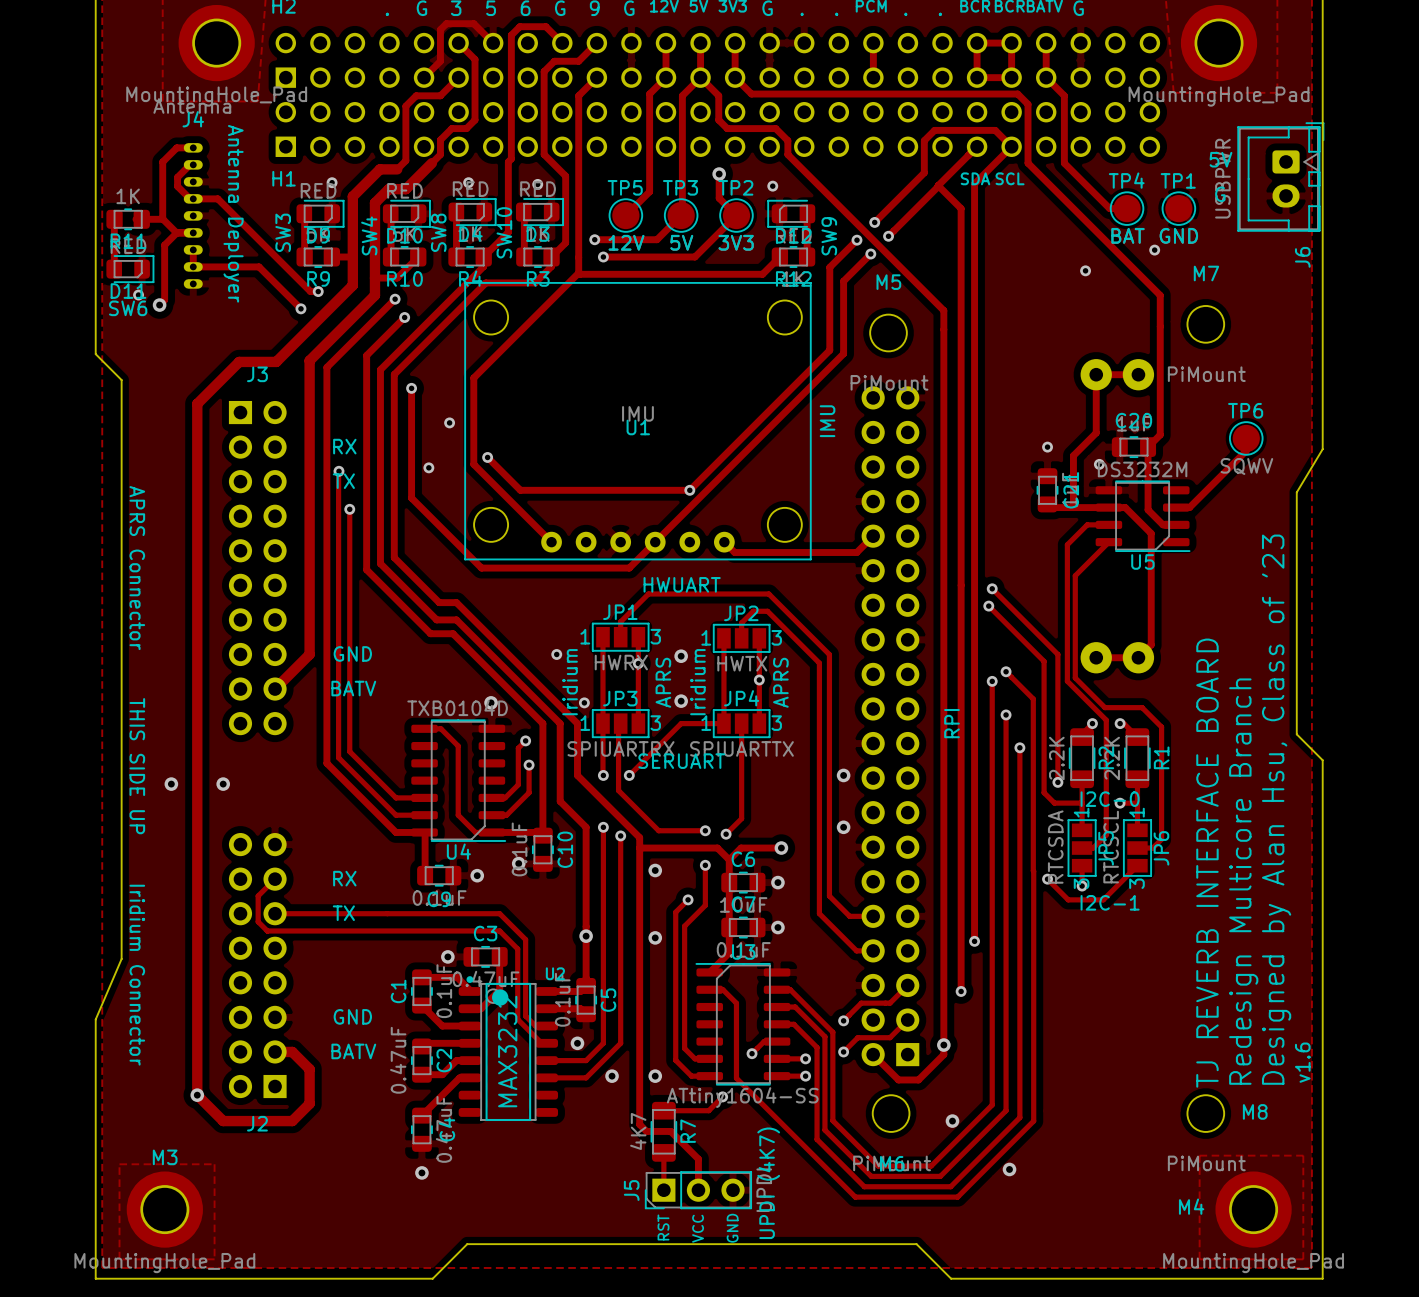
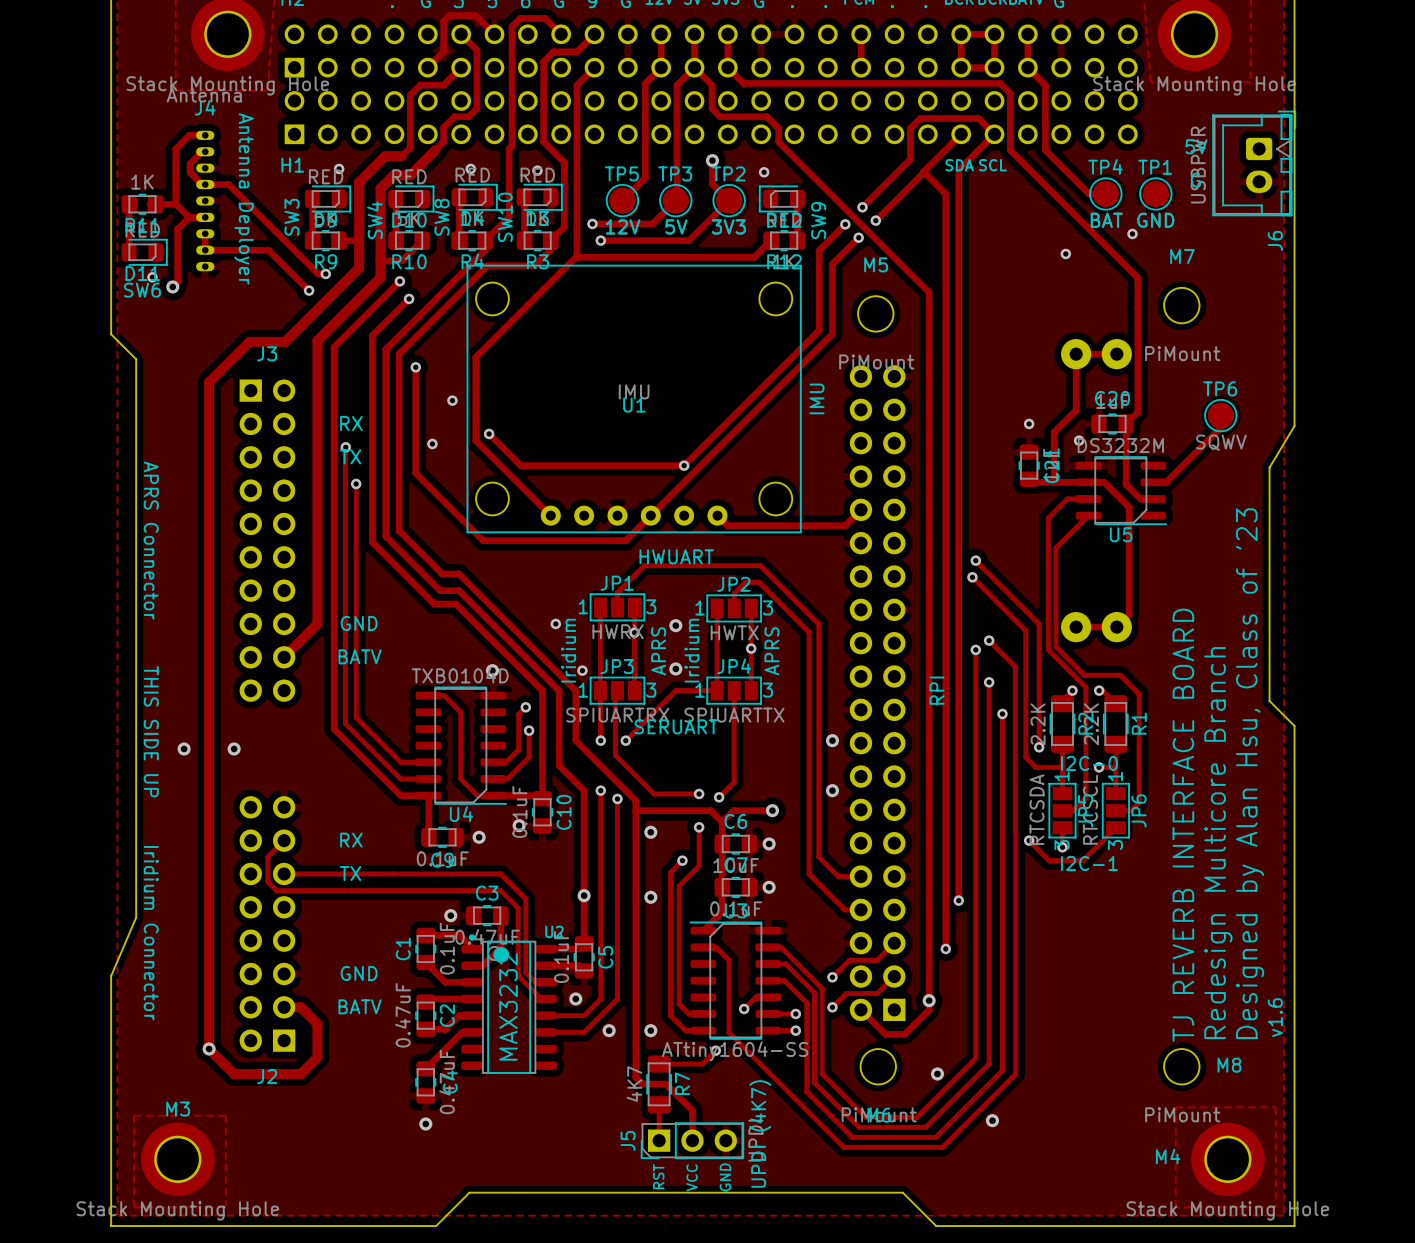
part value: MountingHole_Pad (216, 96) -> Stack Mounting Hole (227, 85)
part value: MountingHole_Pad (1219, 96) -> Stack Mounting Hole (1194, 85)
M3 value: MountingHole_Pad (164, 1263) -> Stack Mounting Hole (177, 1210)
M4 value: MountingHole_Pad (1253, 1263) -> Stack Mounting Hole (1227, 1210)

